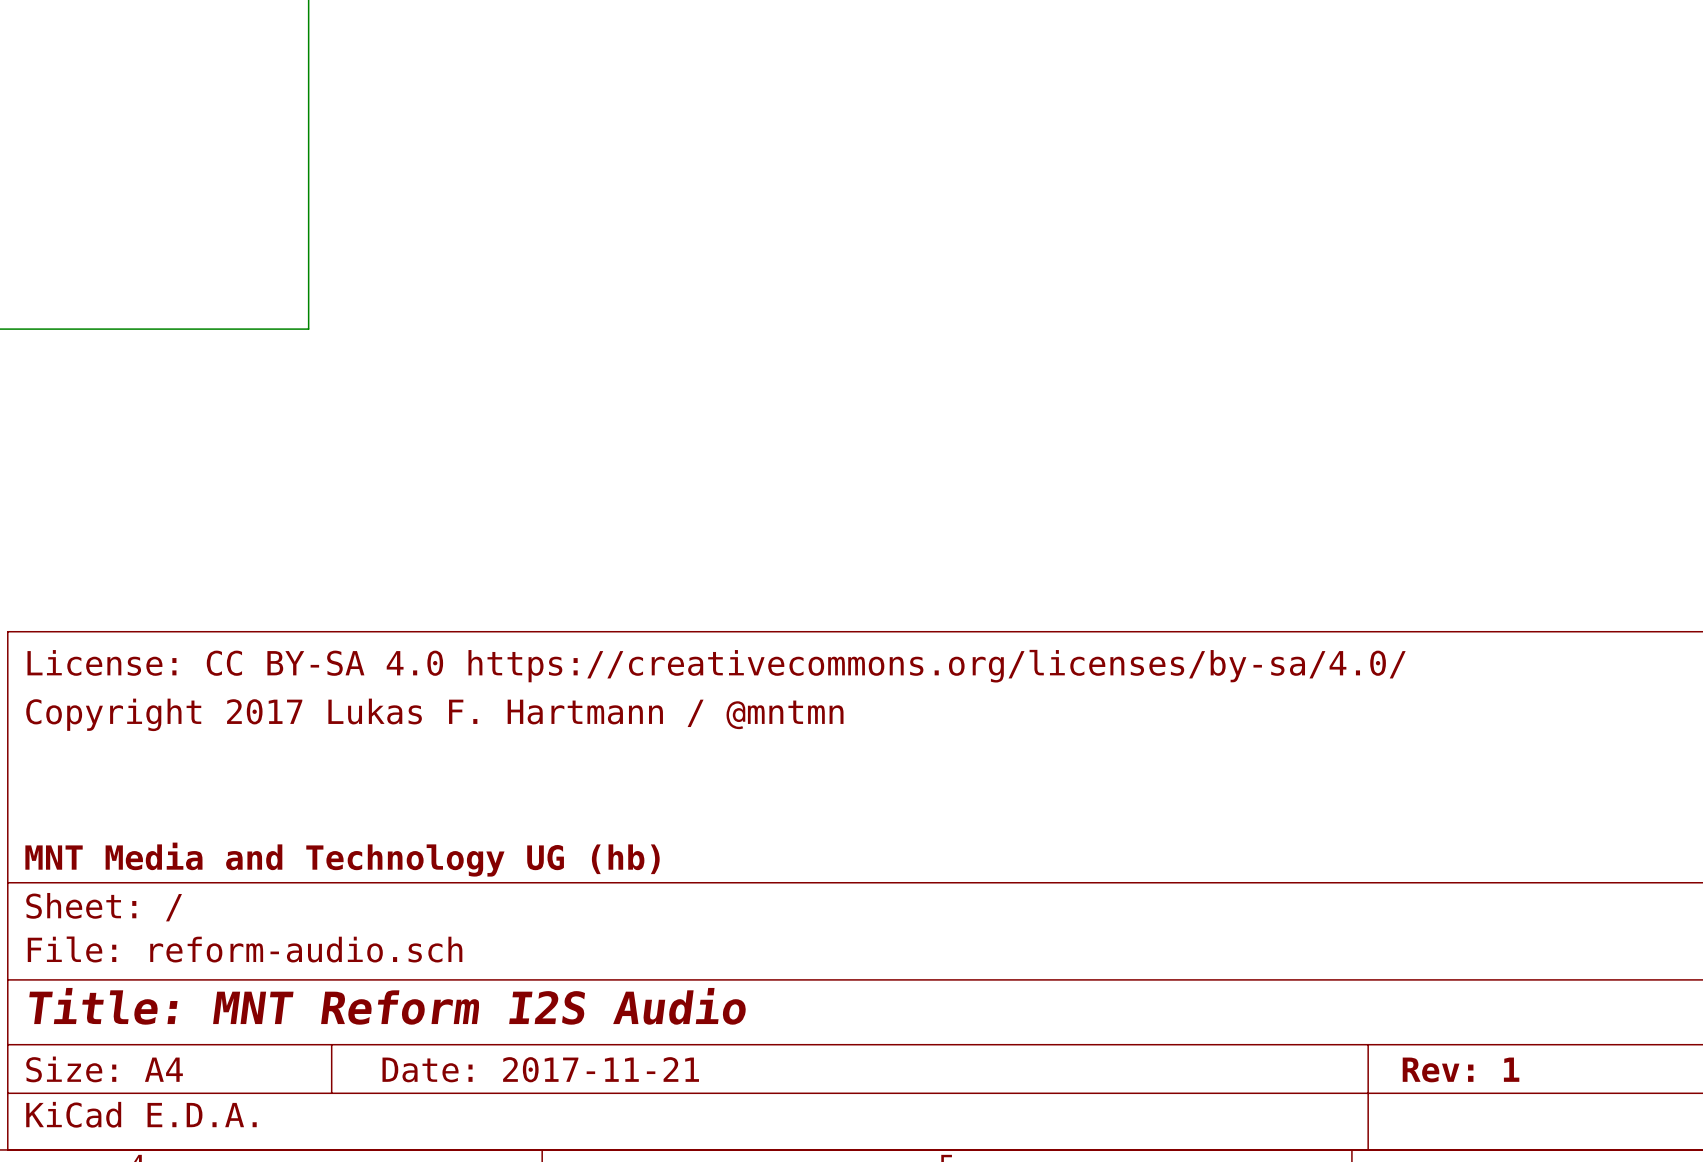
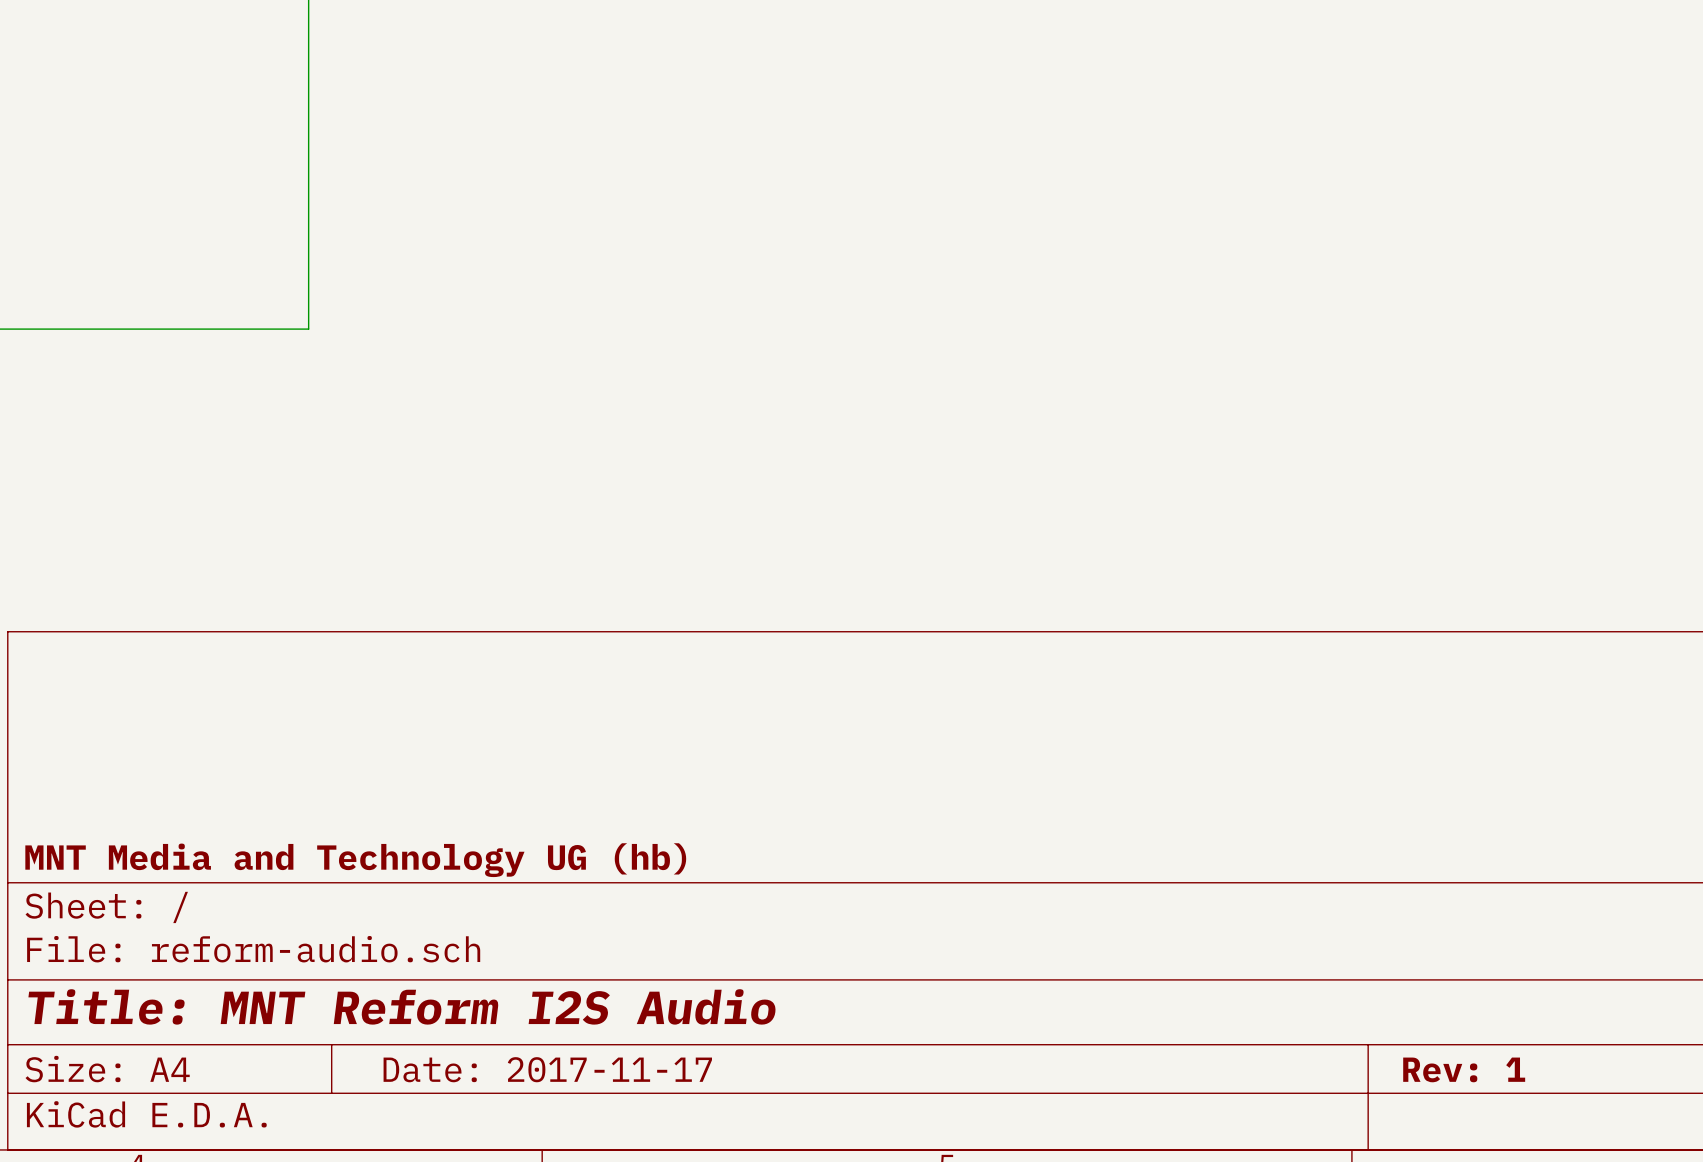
title block: License: CC BY-SA 4.0 https://creativecommons.org/licenses/by-sa/4.0/ (716, 666) -> none
title block: Copyright 2017 Lukas F. Hartmann / @mntmn (434, 714) -> none
title block: Date: 2017-11-21 (540, 1069) -> Date: 2017-11-17 (547, 1069)

